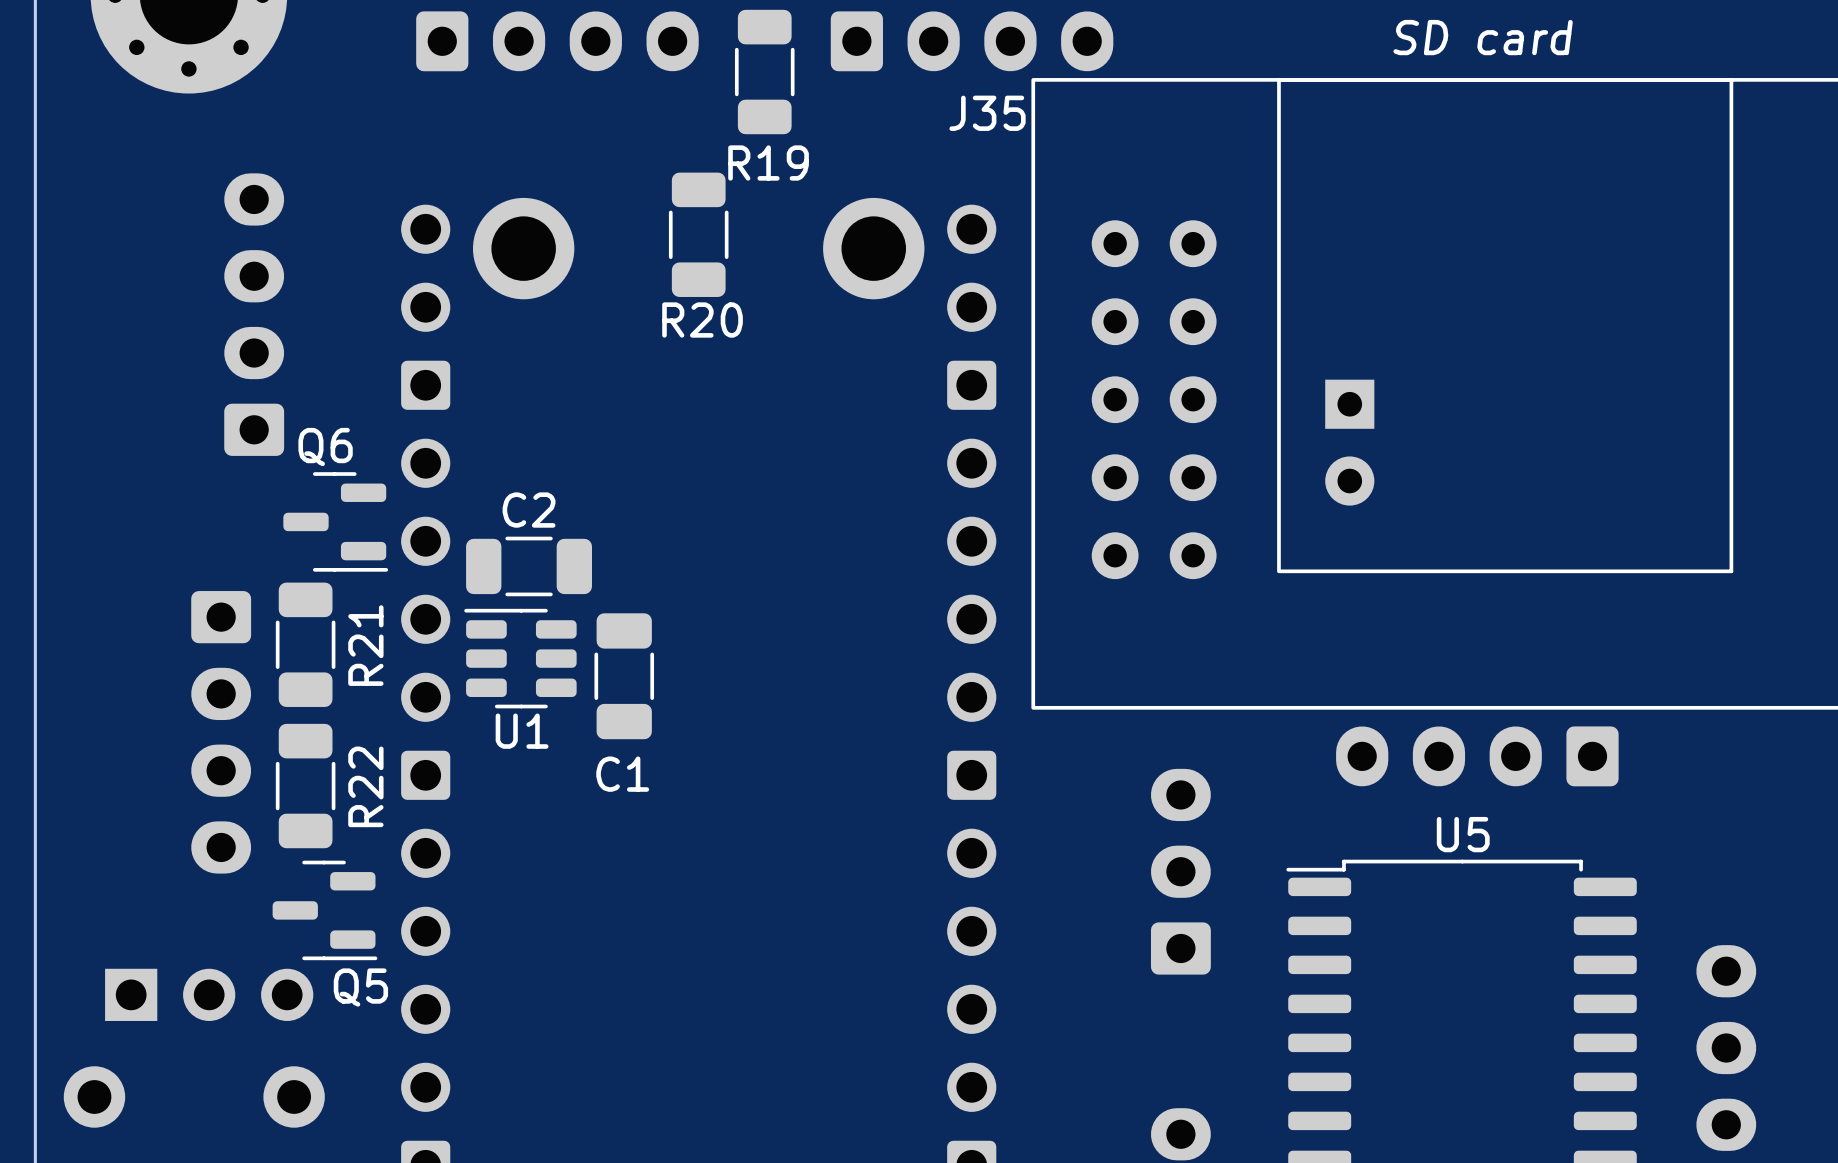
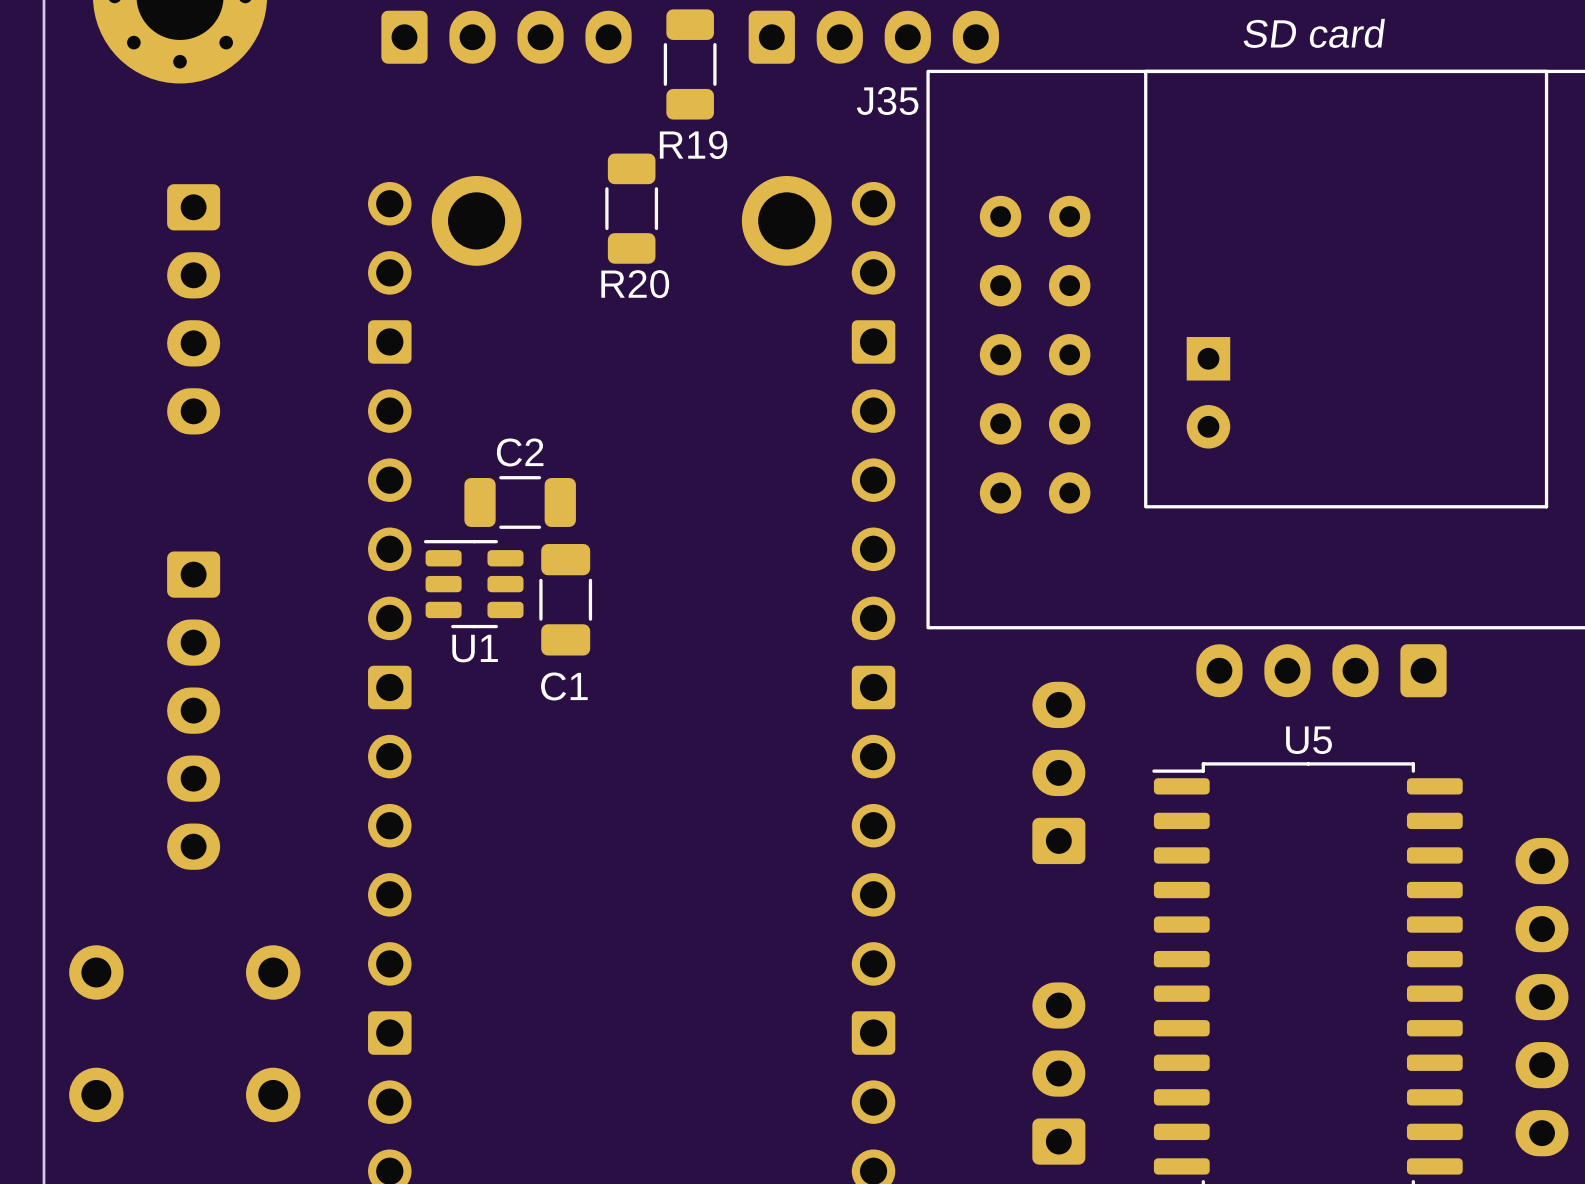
part rotation: 0° (254, 314) -> 180° (193, 309)
Q6: (335, 521) -> none
C2 position: (529, 566) -> (520, 502)
R21: (305, 644) -> none
part: (221, 732) -> none
R22: (305, 786) -> none
part: none -> (193, 710)
Q5: (324, 910) -> none
part: (209, 994) -> none

